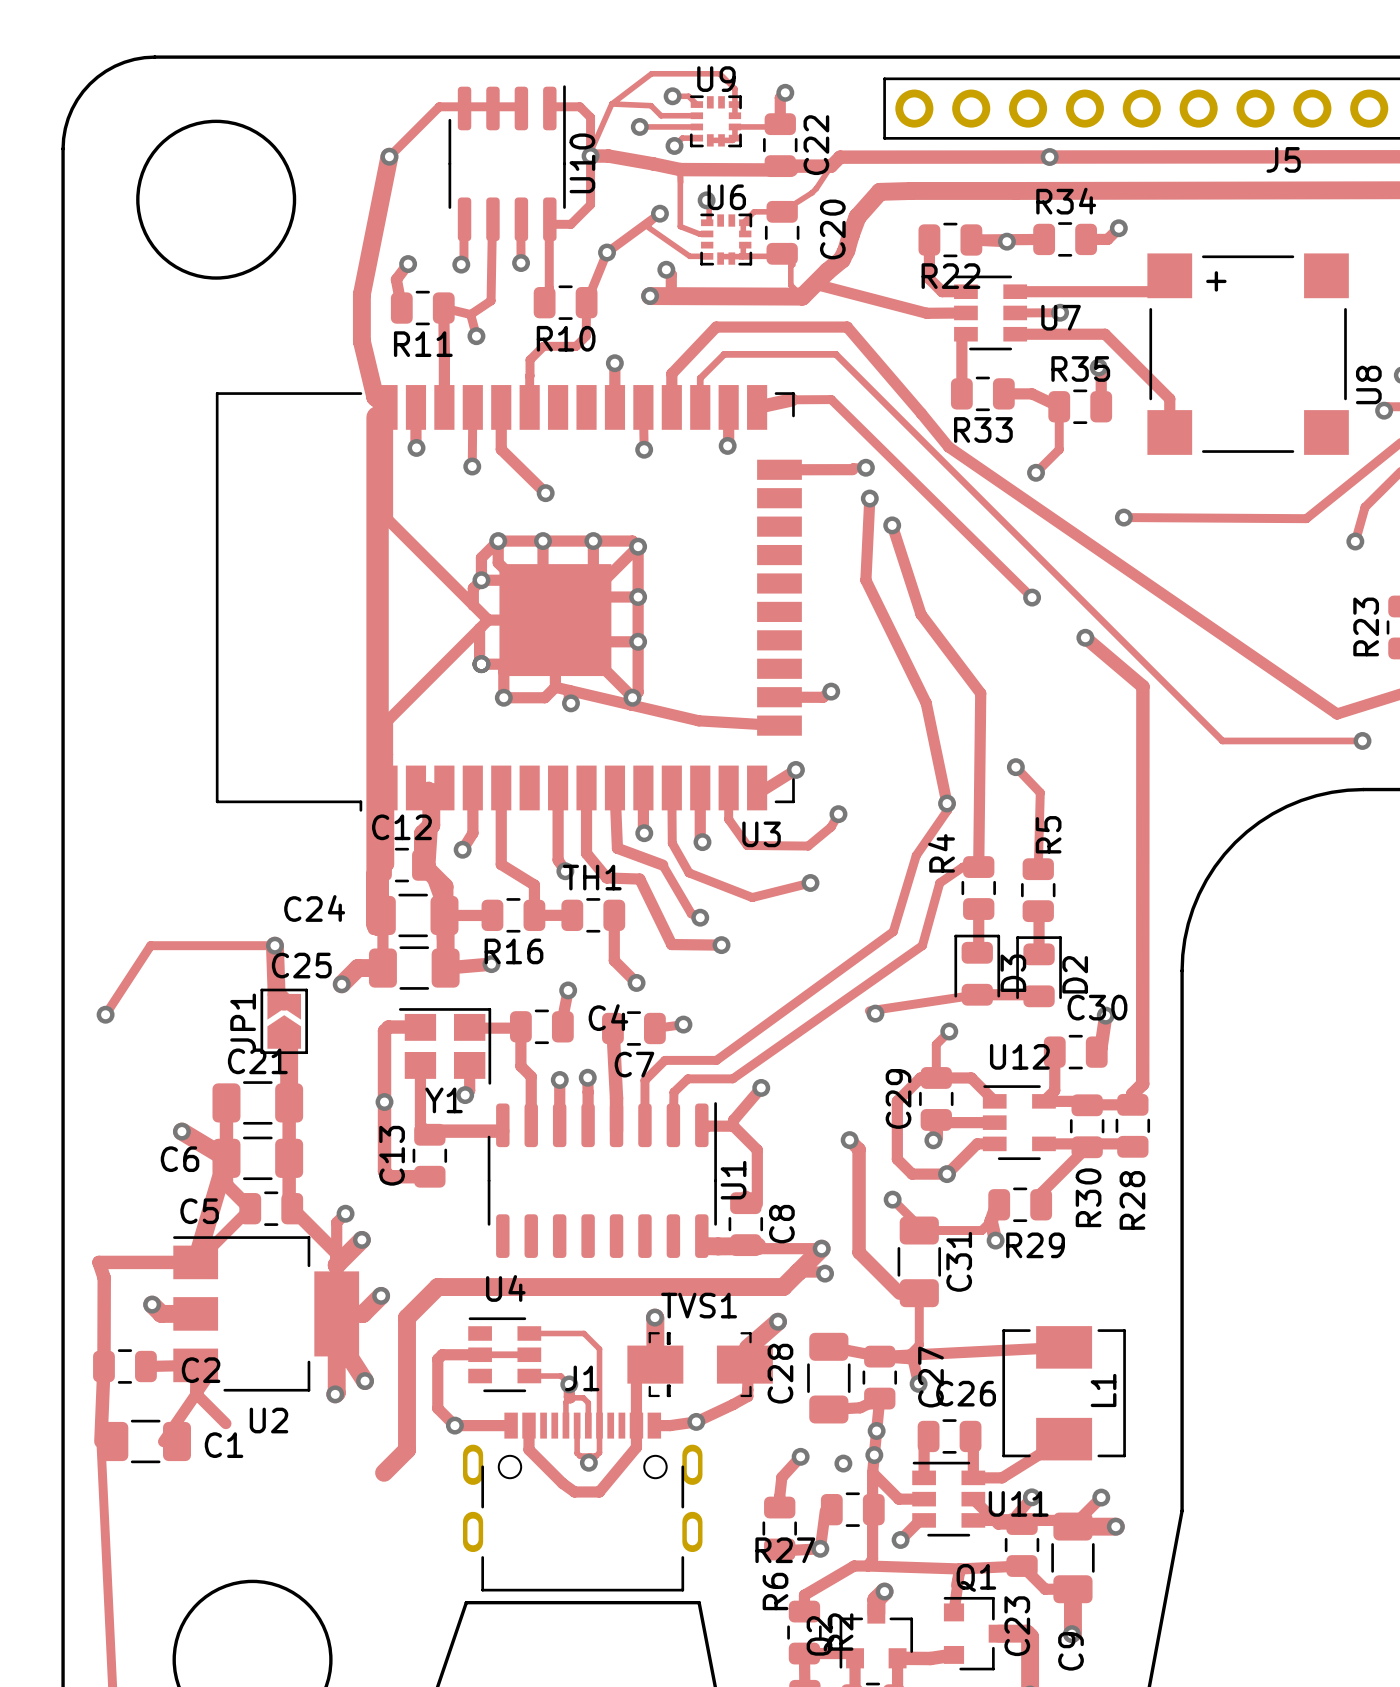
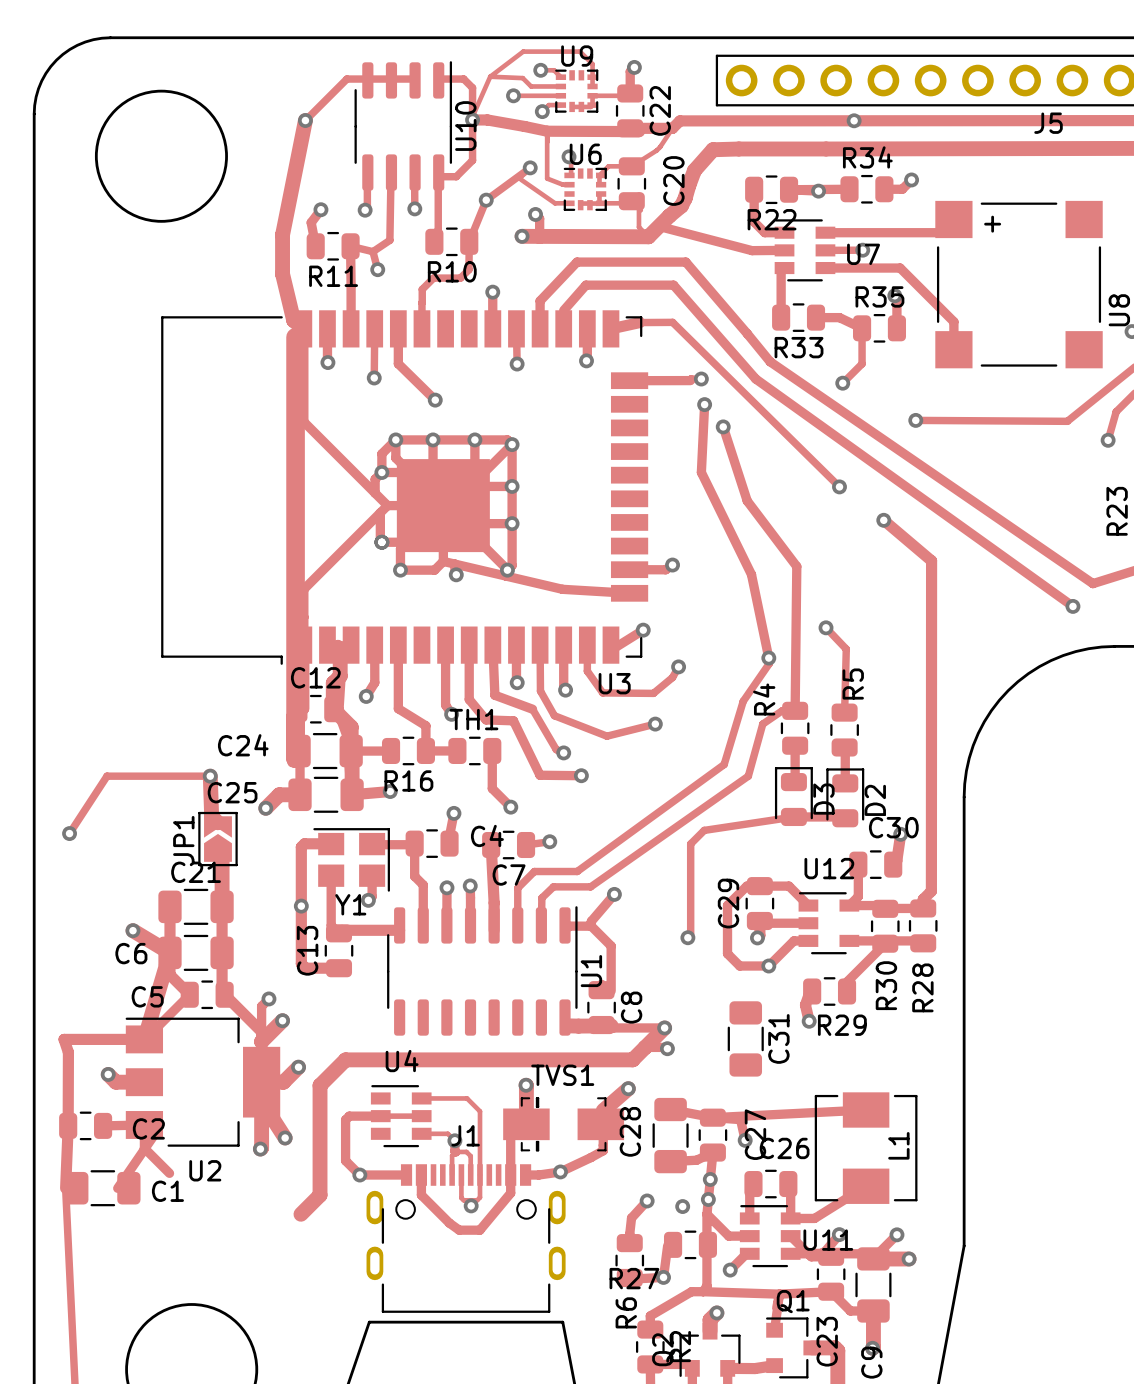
track: (700, 385) (700, 378) (724, 354) (835, 354) (1222, 740) (1362, 740) -> (563, 310) (585, 285) (673, 285) (755, 379) (1072, 606)
via position: (1362, 740) -> (1072, 606)
track: none -> (704, 830) (690, 843) (690, 934)
via: (875, 1013) -> none
track: (949, 1031) (936, 1044) (936, 1077) -> none
via: (949, 1031) -> none
track: (849, 1140) (859, 1149) (859, 1252) (899, 1293) (919, 1293) (919, 1344) (909, 1355) -> none
track: (892, 1199) (919, 1226) (919, 1230) (981, 1230) (991, 1221) -> none
via: (892, 1199) -> none

